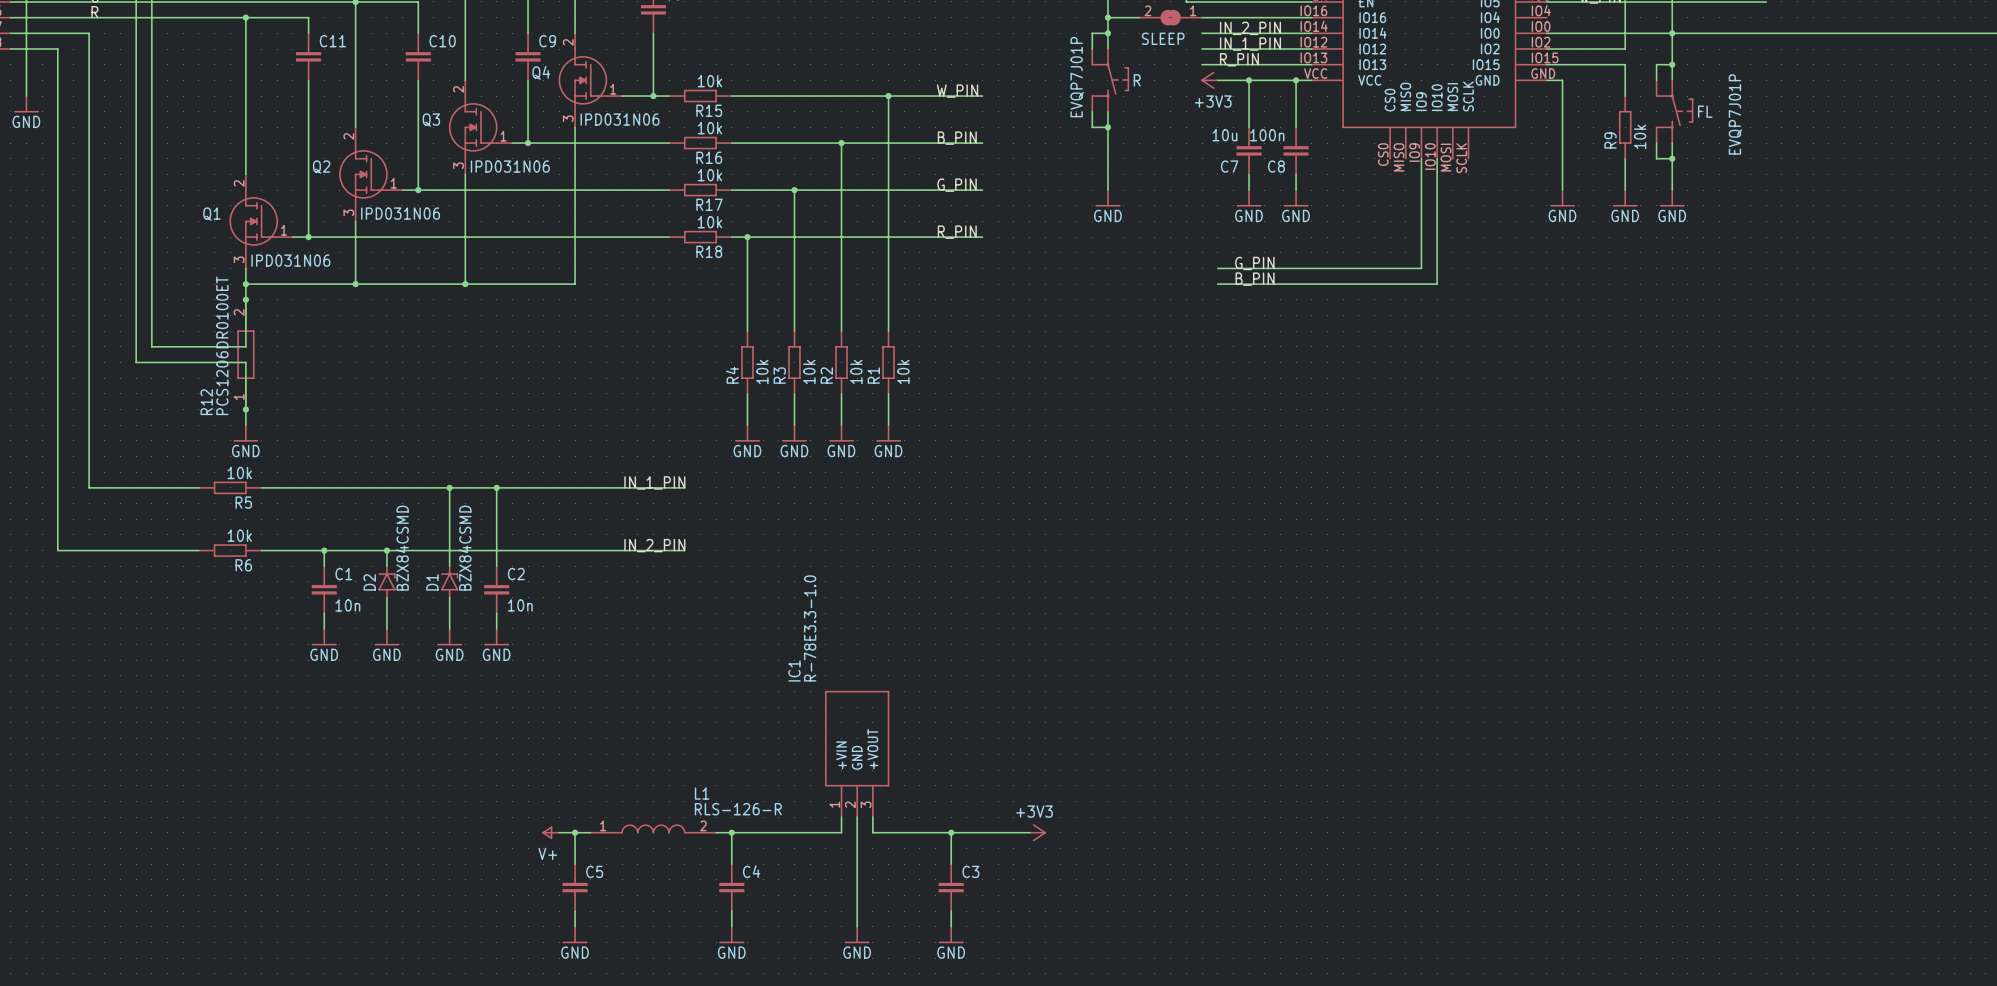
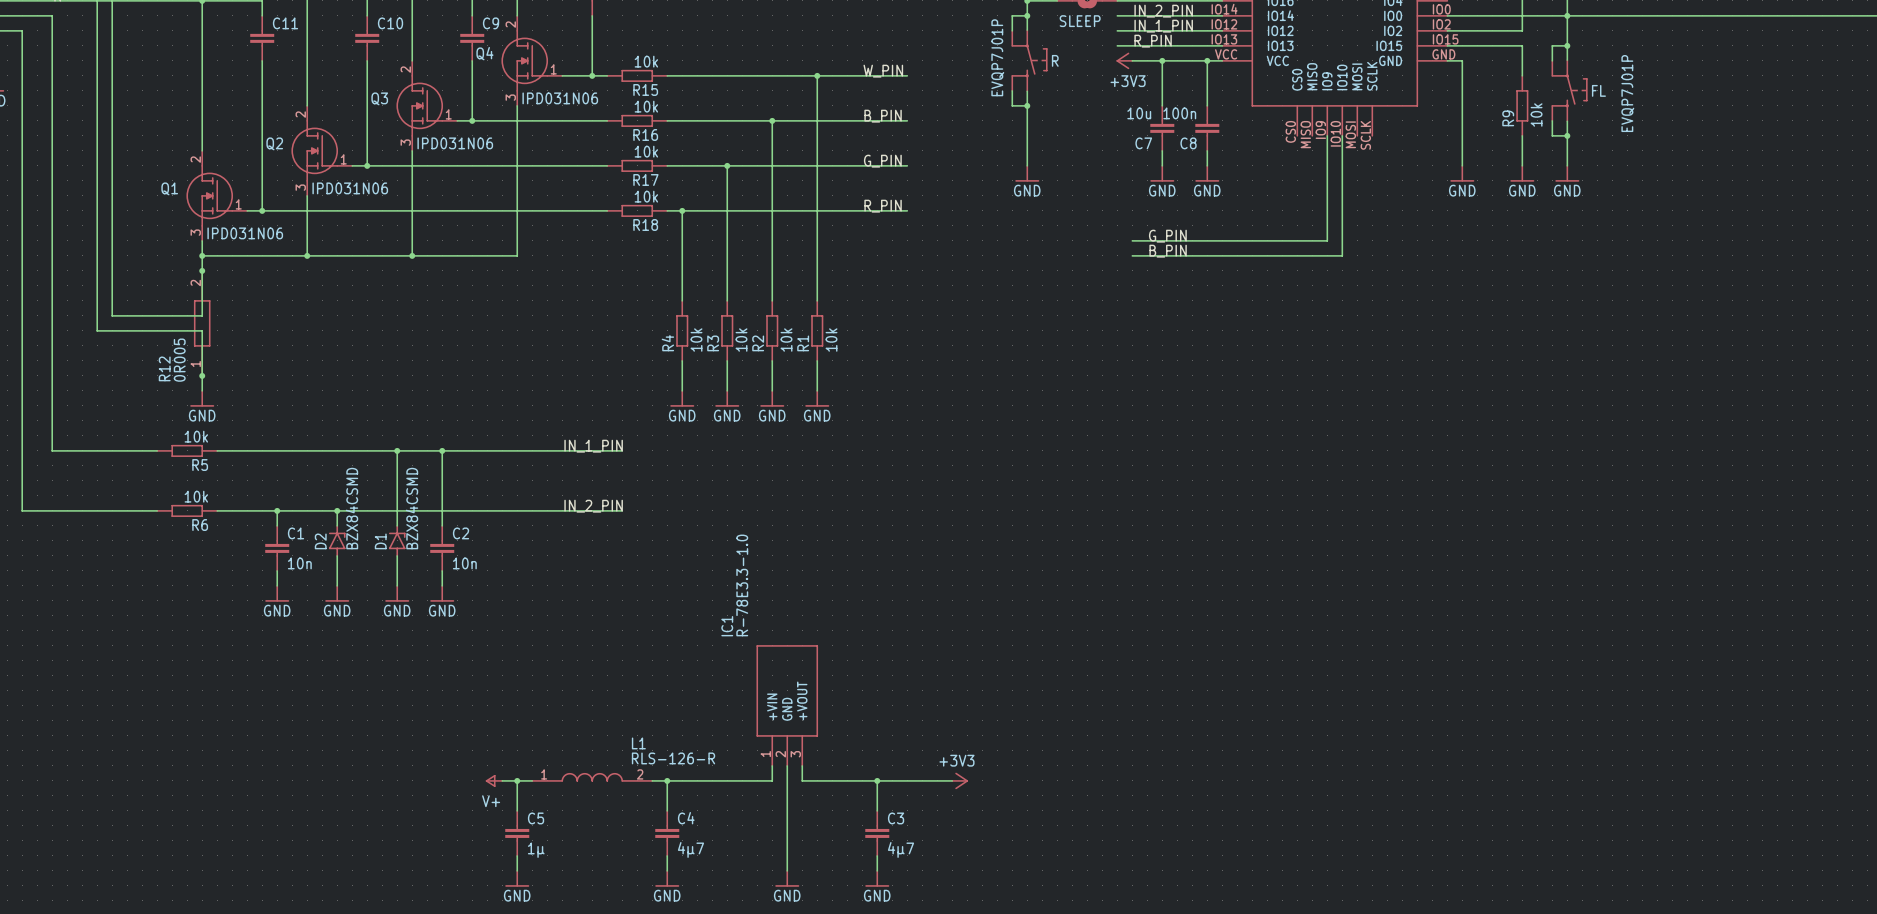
R12 value: PCS1206DR0100ET (222, 345) -> 0R005 (179, 360)
C4 value: none -> 4µ7 (690, 849)
C3 value: none -> 4µ7 (901, 849)
C5 value: none -> 1µ (536, 850)

